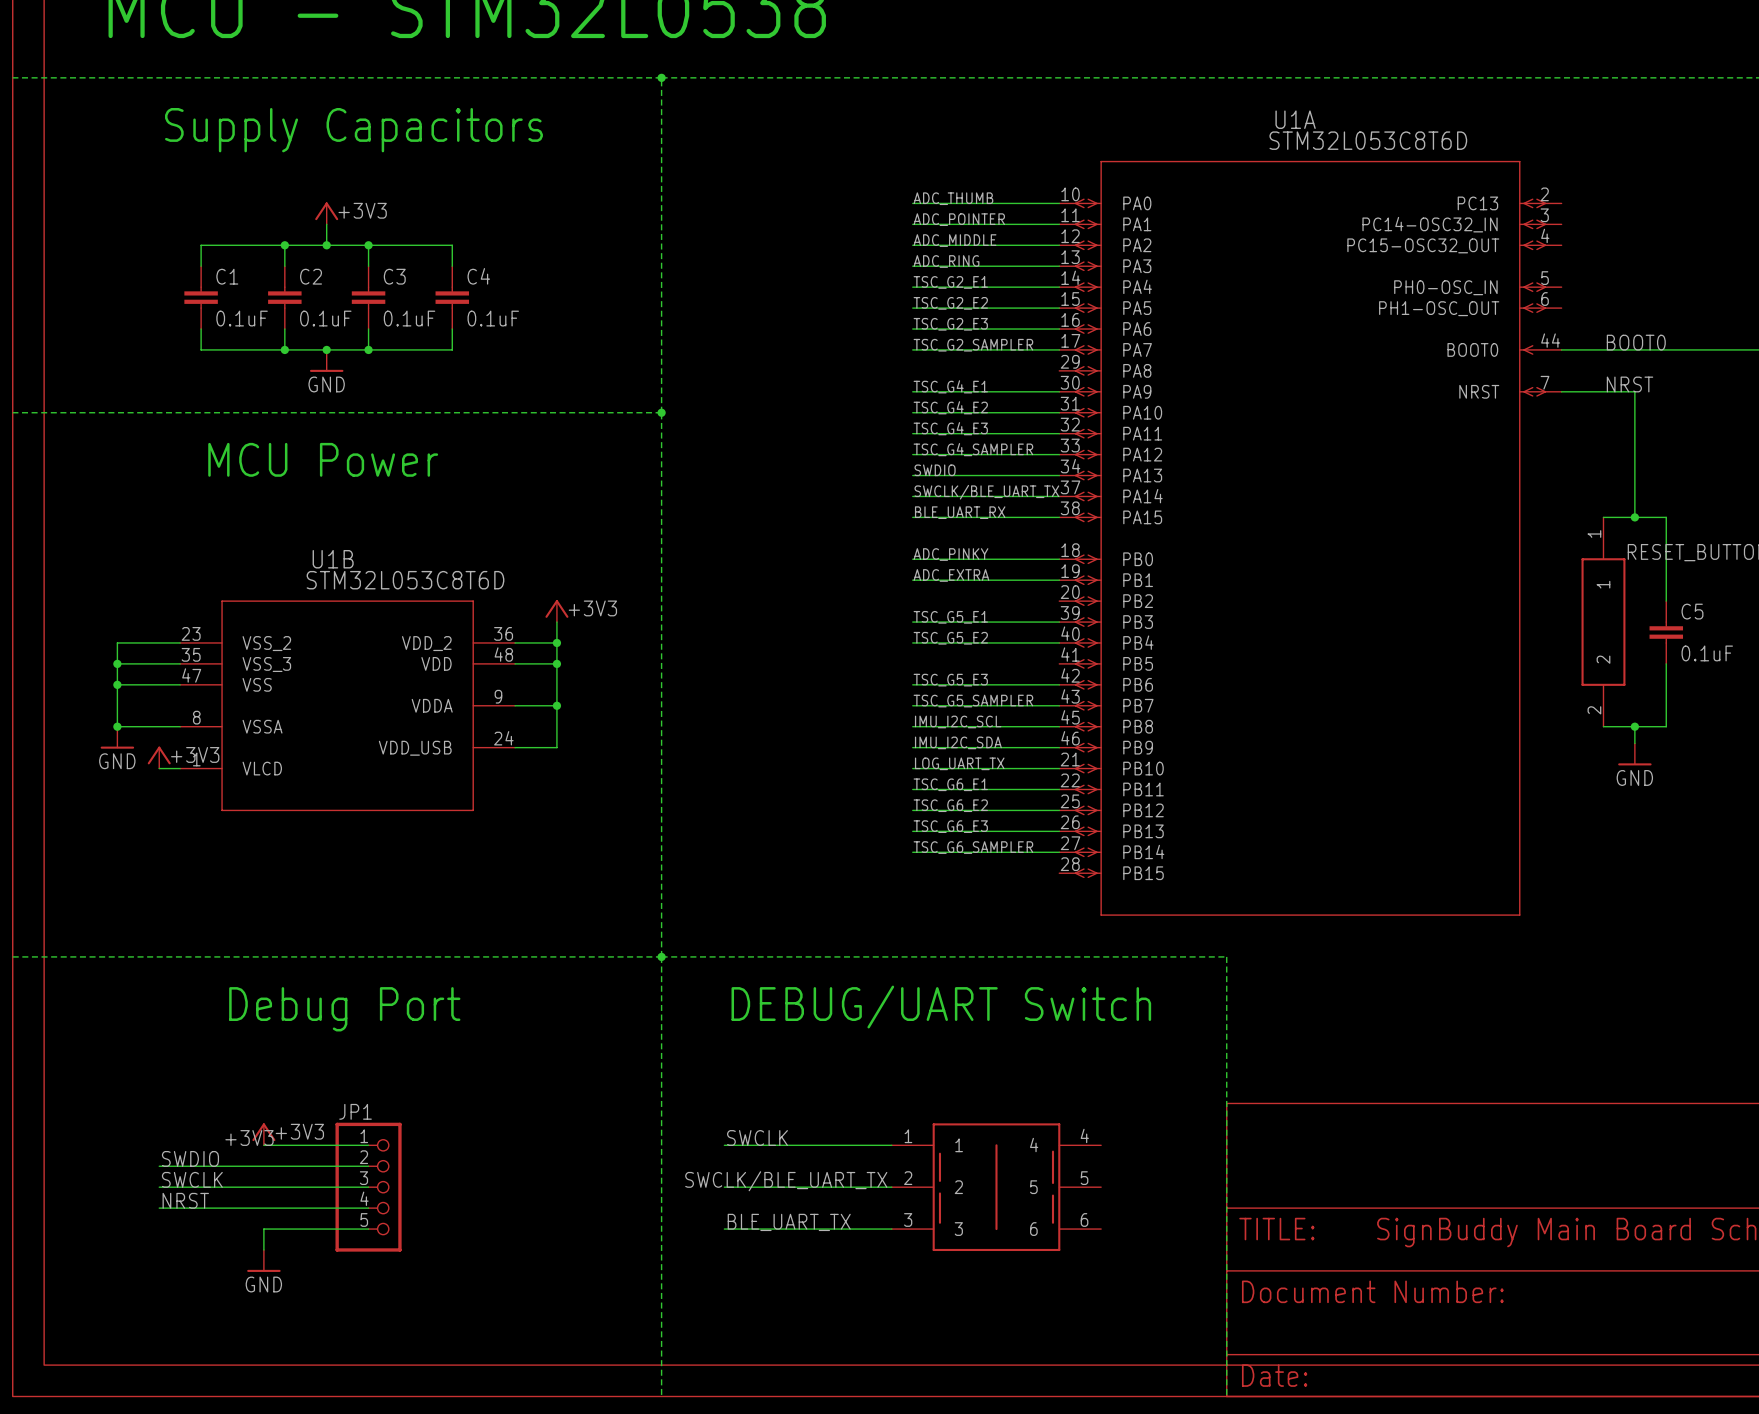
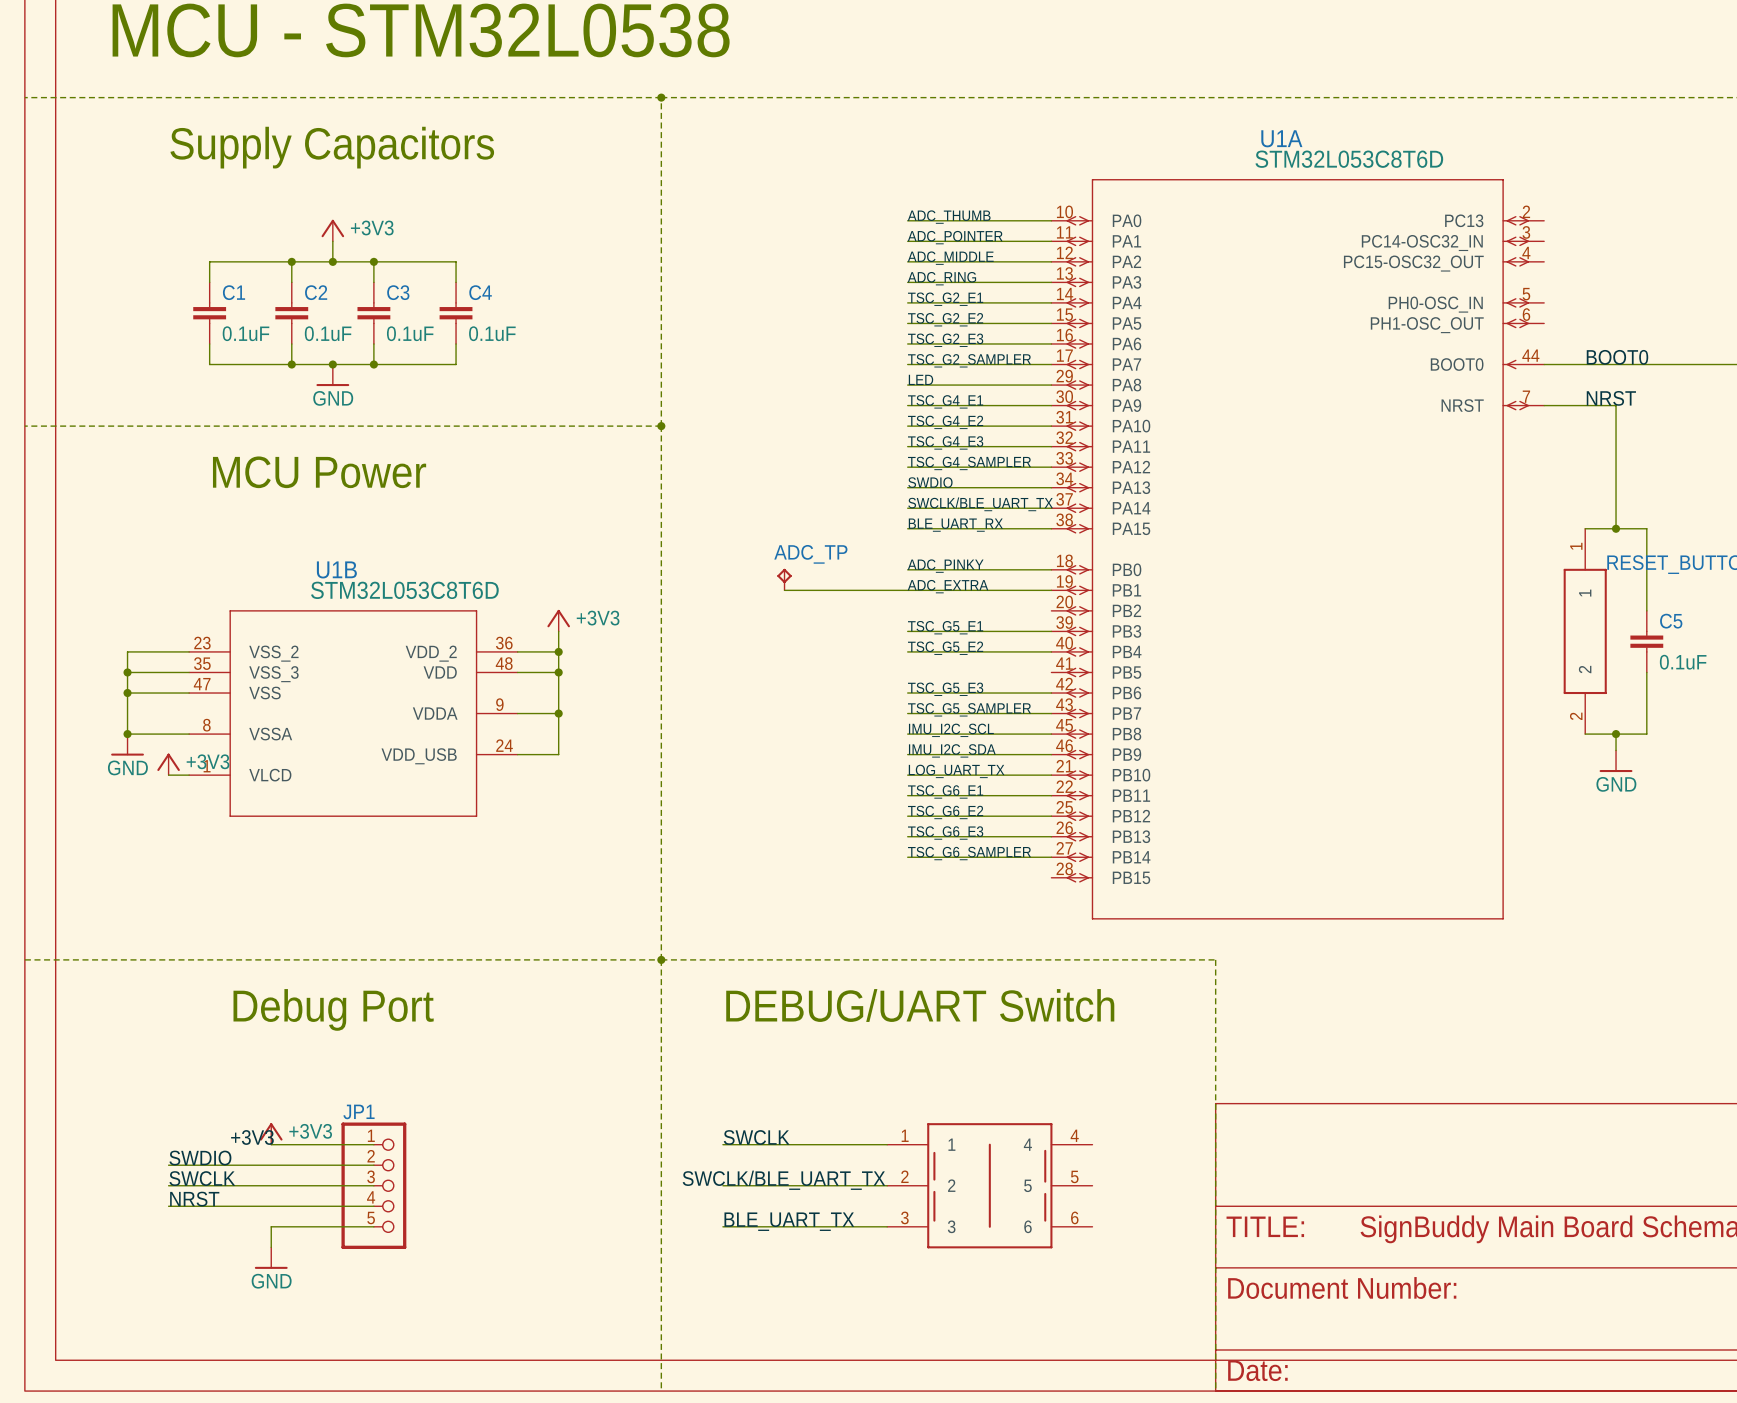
label: none -> LED (920, 379)
wire: none -> (907, 385) (1051, 385)
ADC_TP: none -> (784, 579)
wire: none -> (784, 590) (907, 590)

